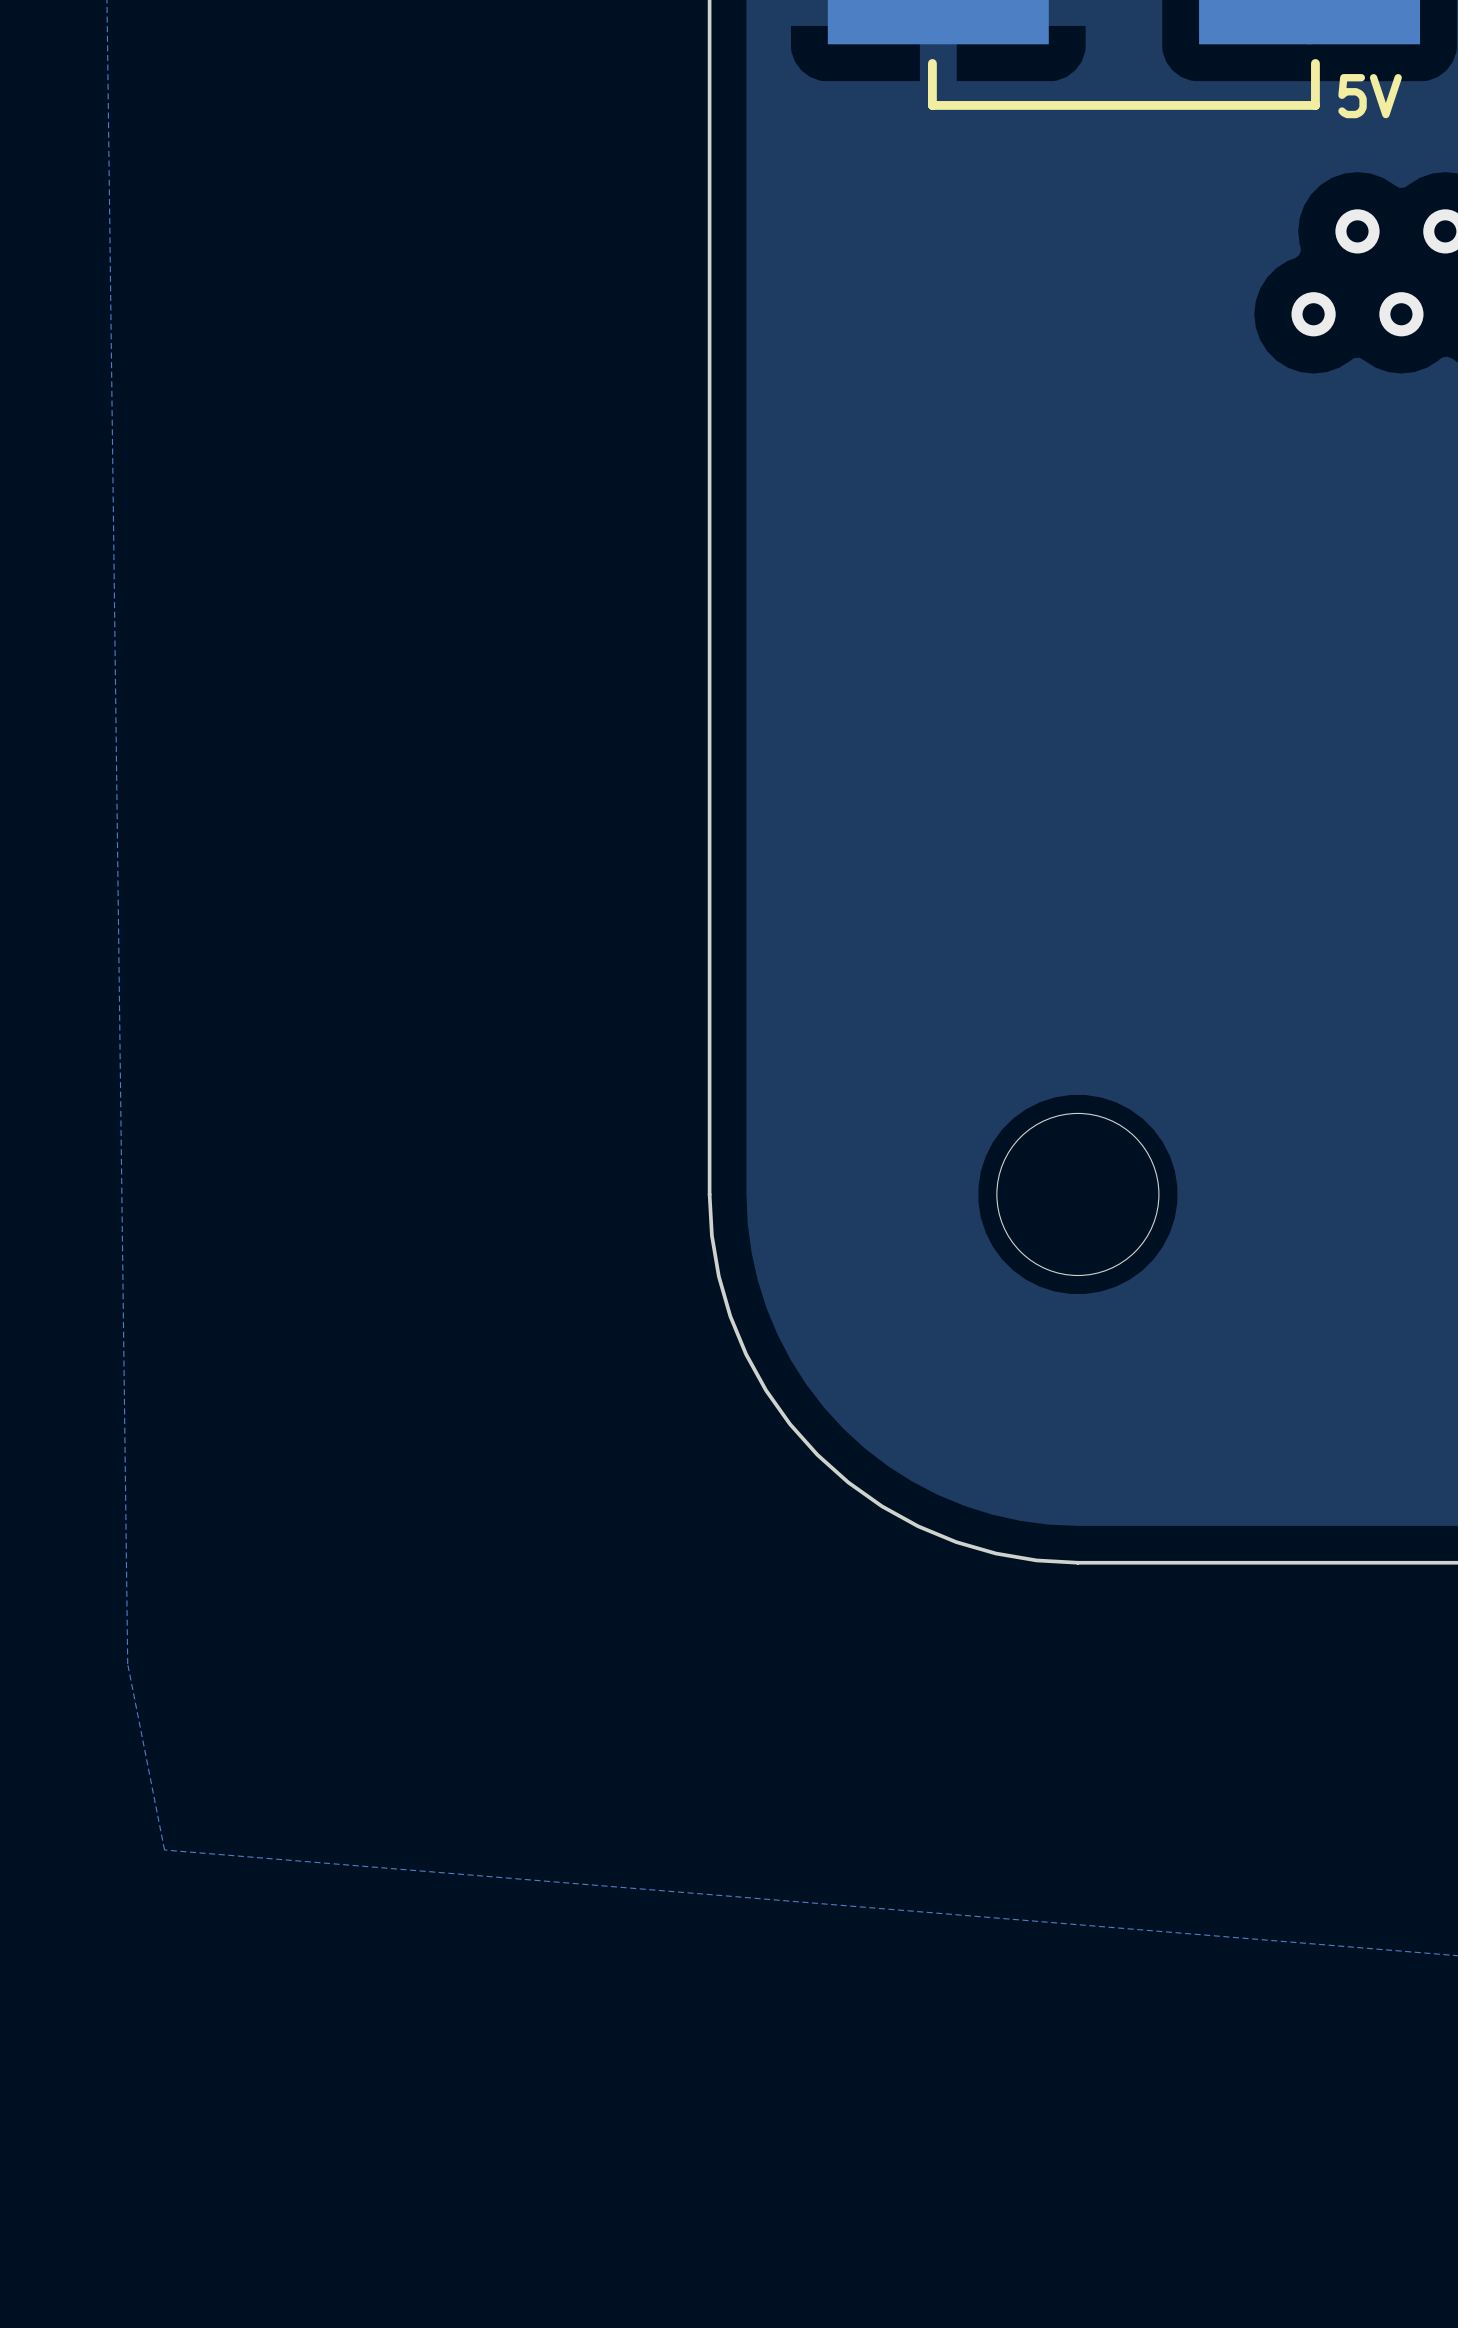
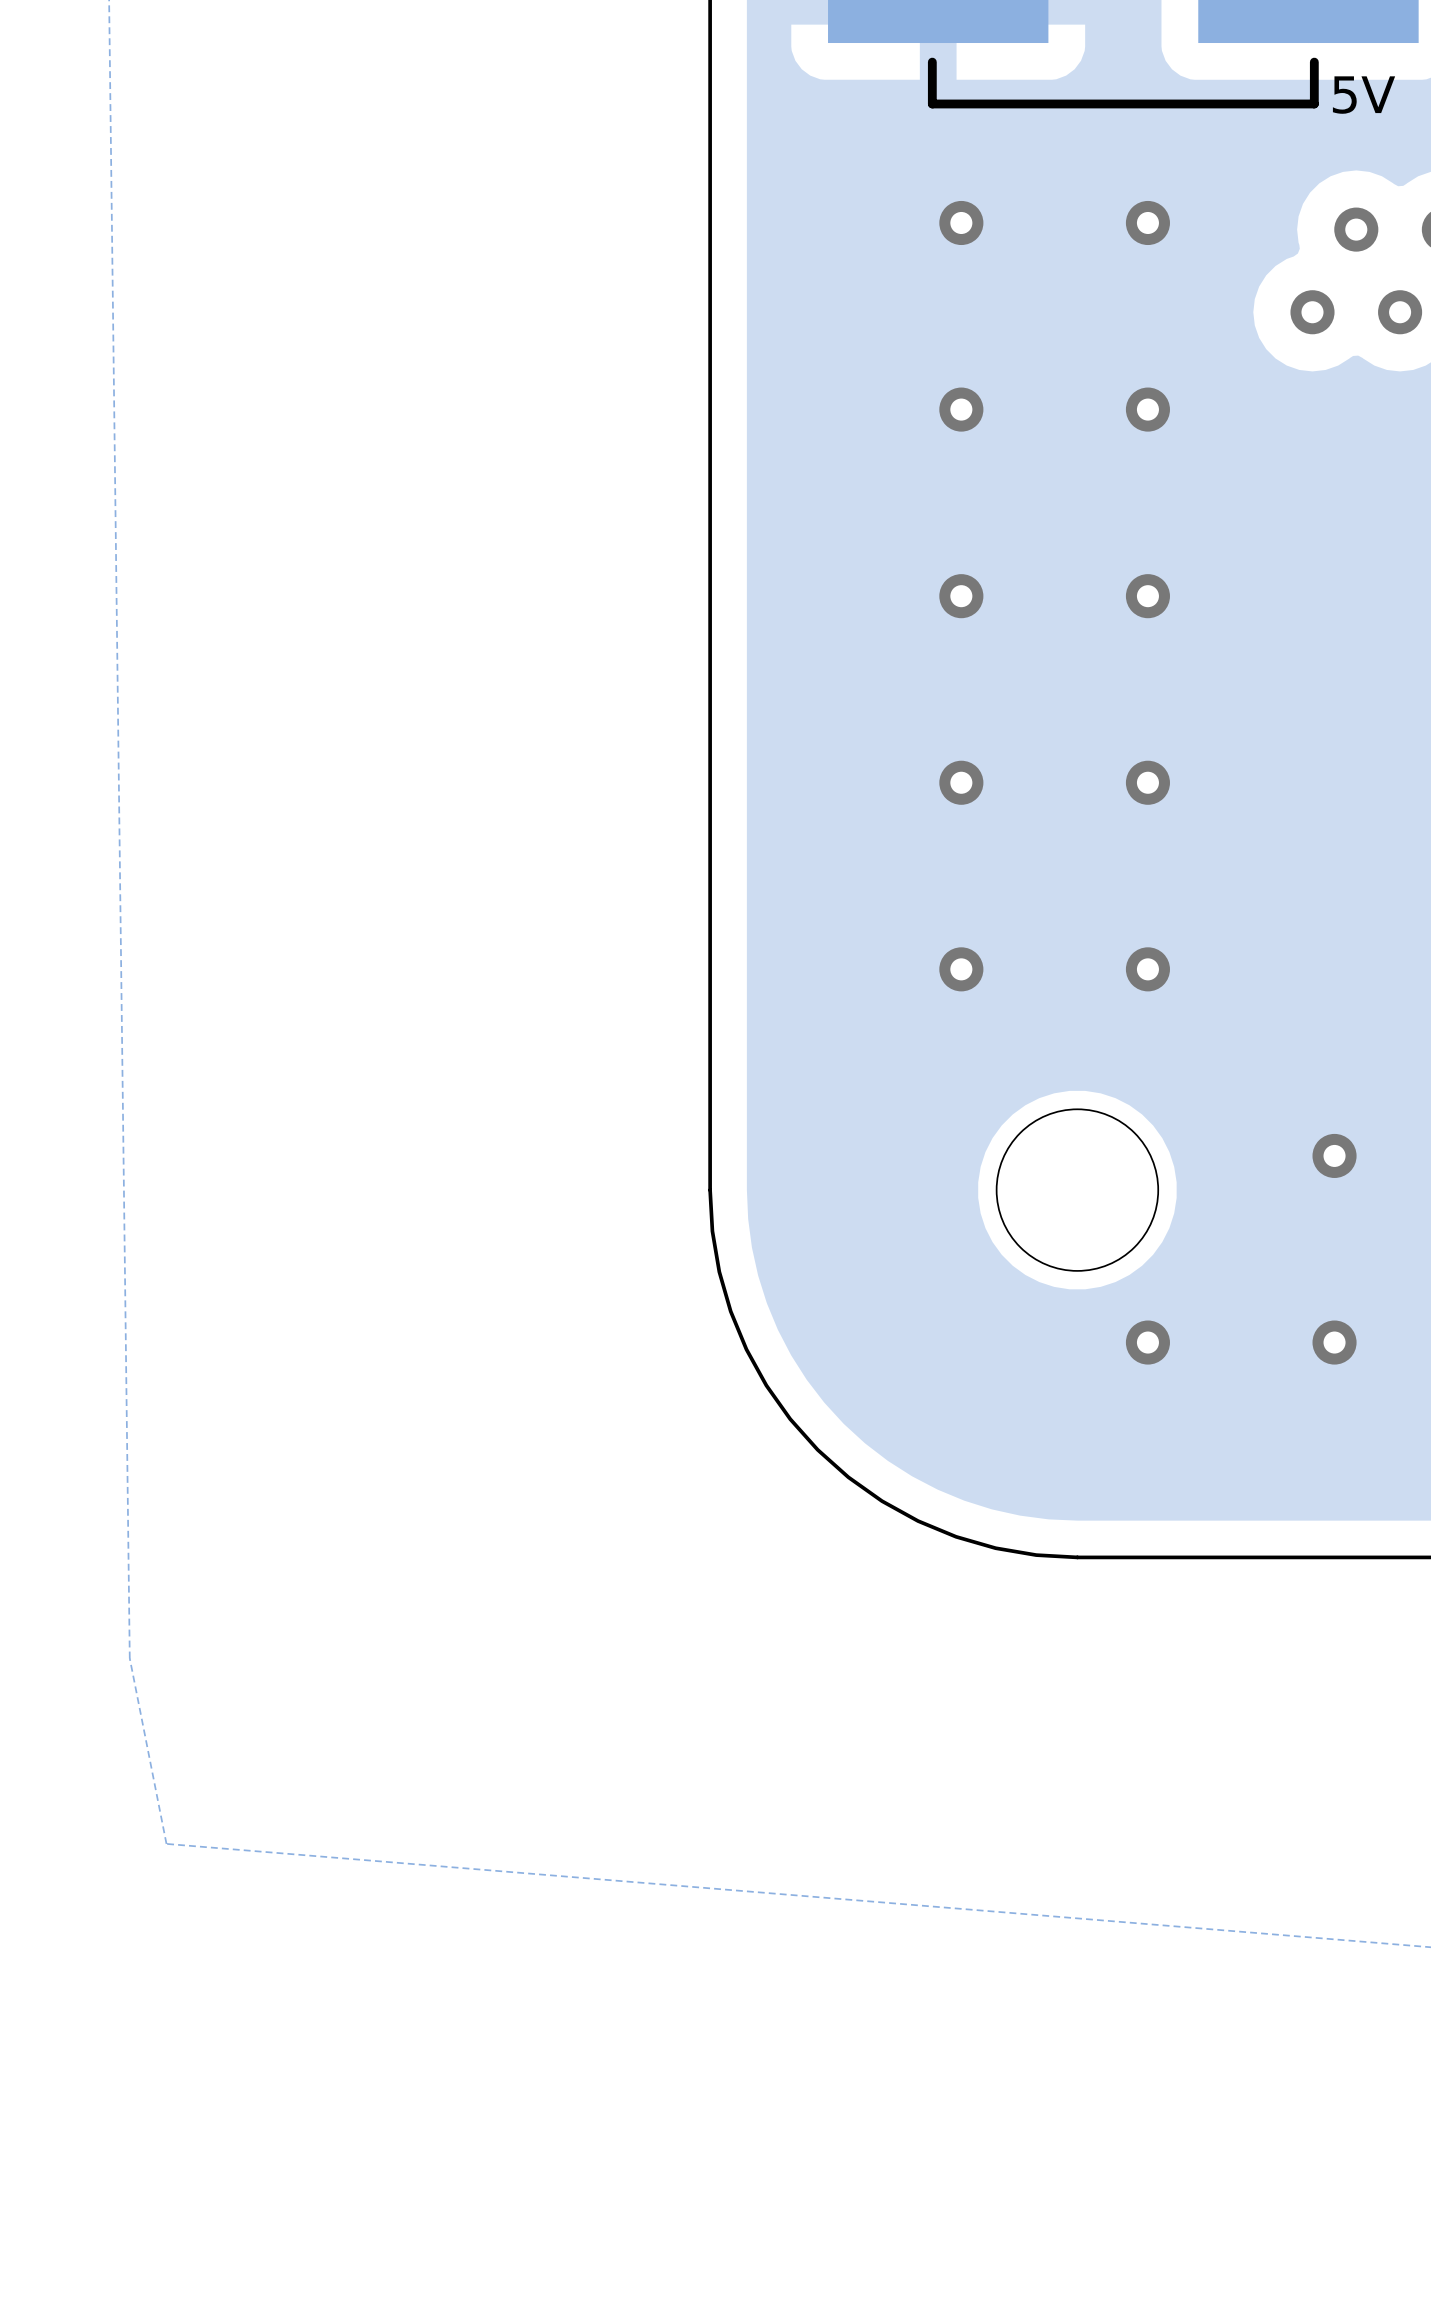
via: none -> (961, 222)
via: none -> (1147, 222)
via: none -> (961, 409)
via: none -> (1147, 409)
via: none -> (961, 596)
via: none -> (1147, 596)
via: none -> (961, 782)
via: none -> (1147, 782)
via: none -> (961, 969)
via: none -> (1147, 969)
via: none -> (1334, 1155)
via: none -> (1147, 1342)
via: none -> (1334, 1342)

